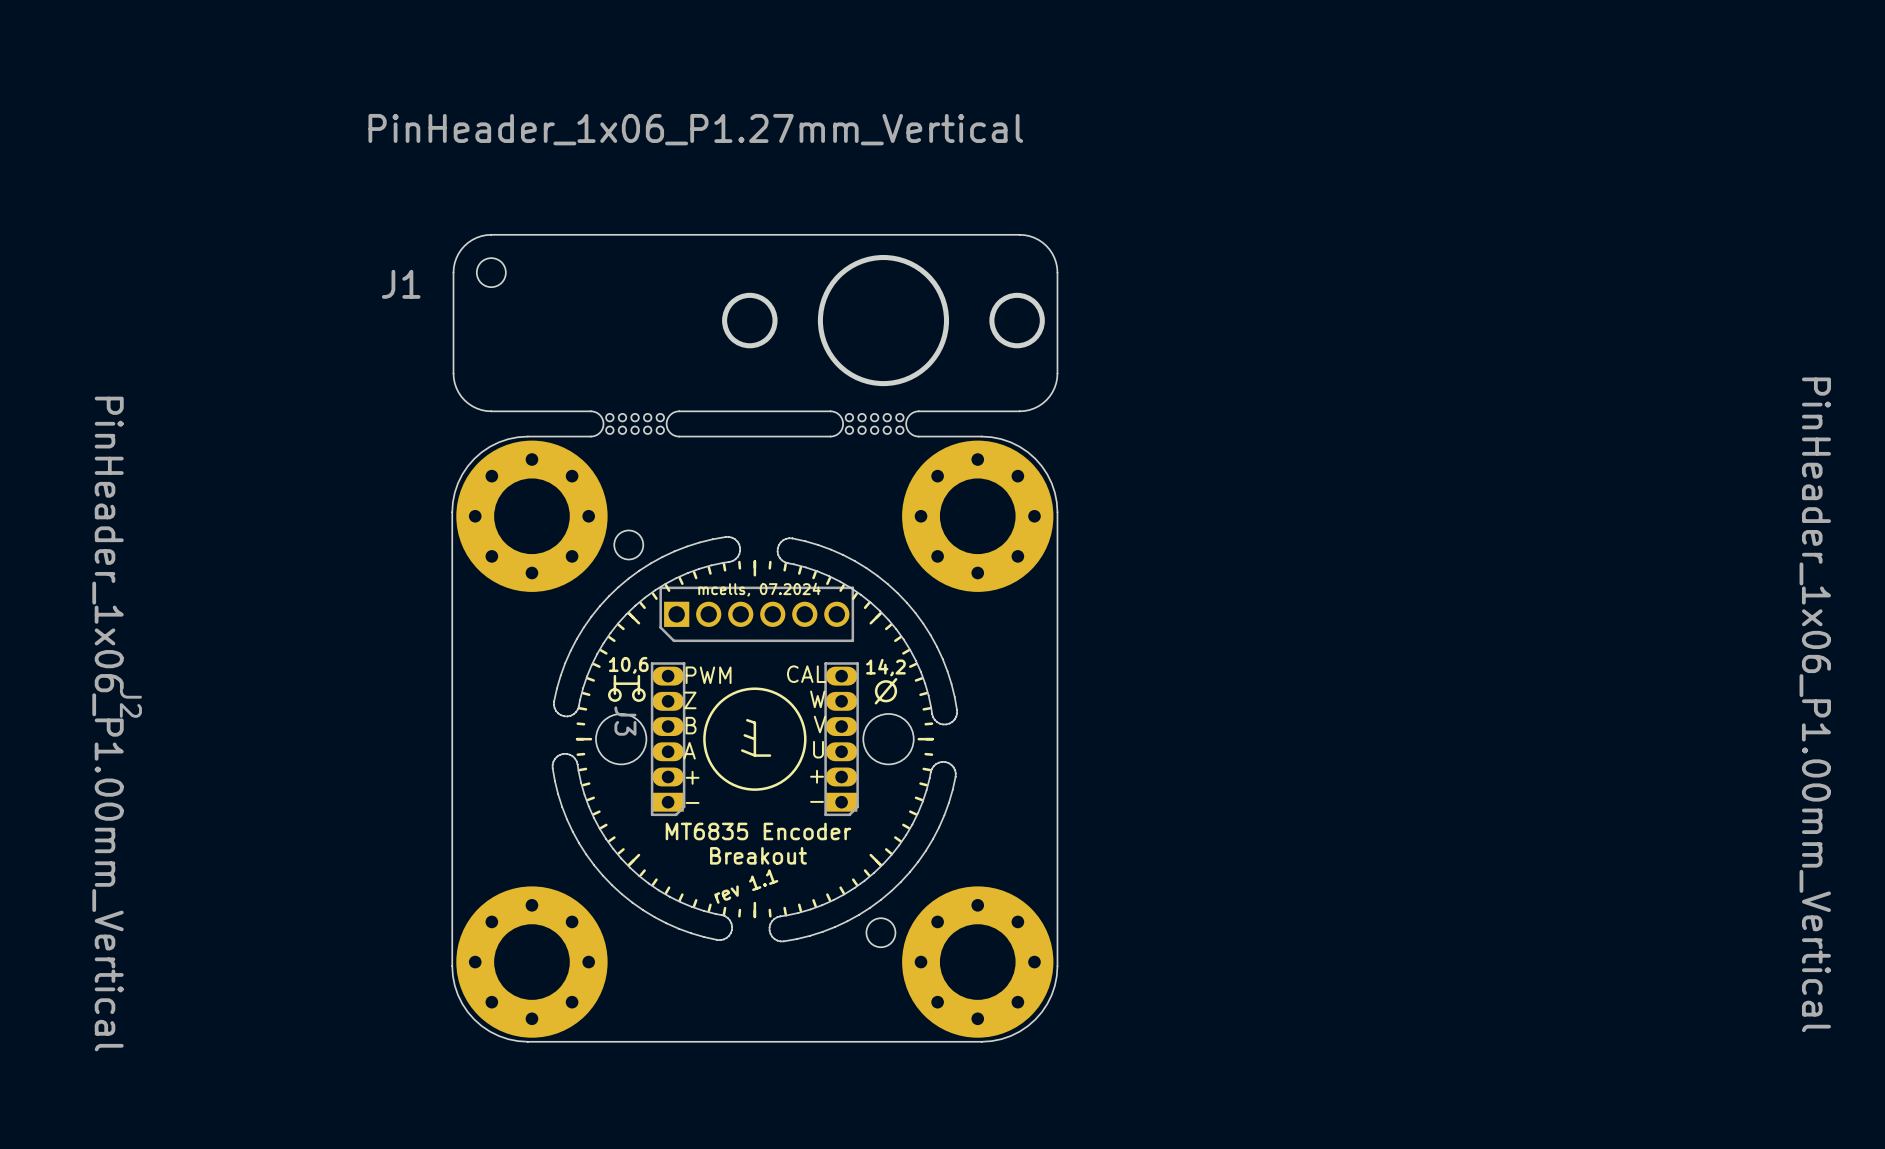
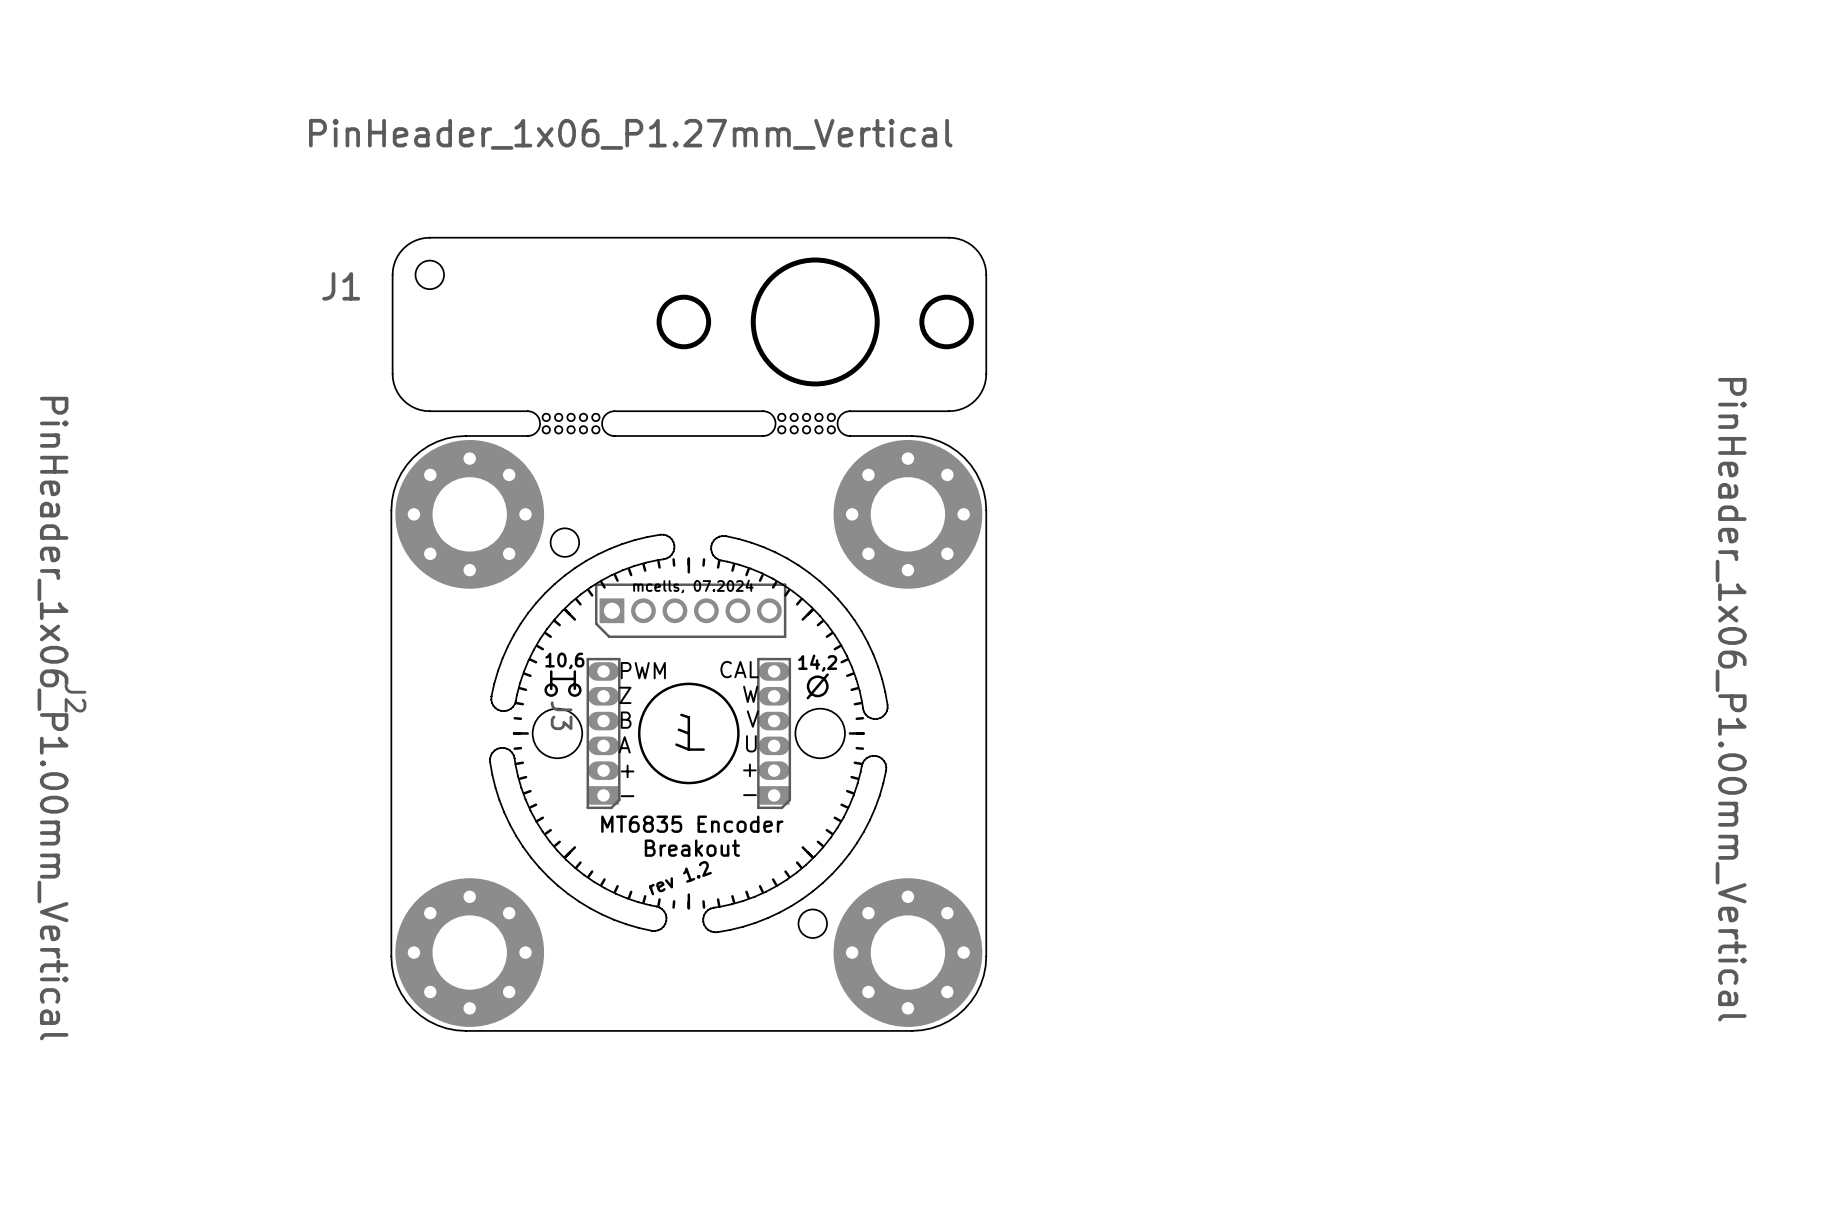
text: rev 1.1 (746, 886) -> rev 1.2 (680, 878)

